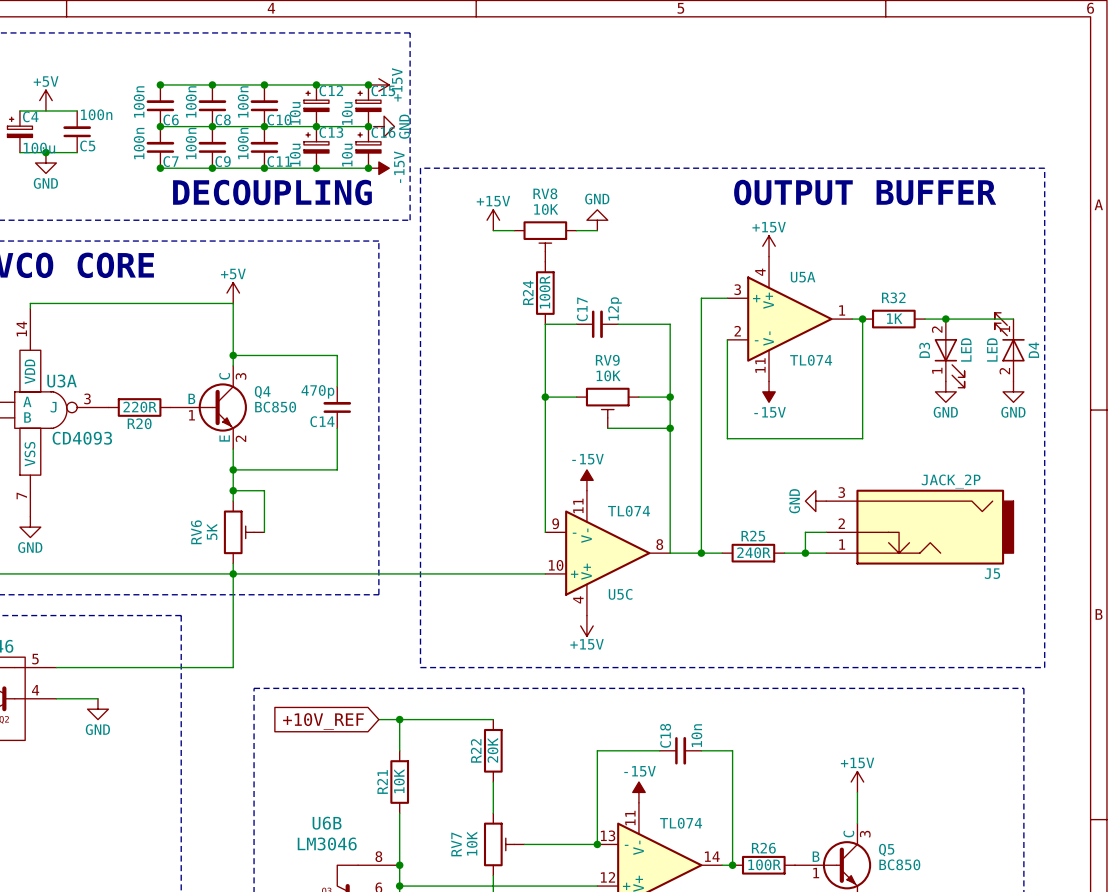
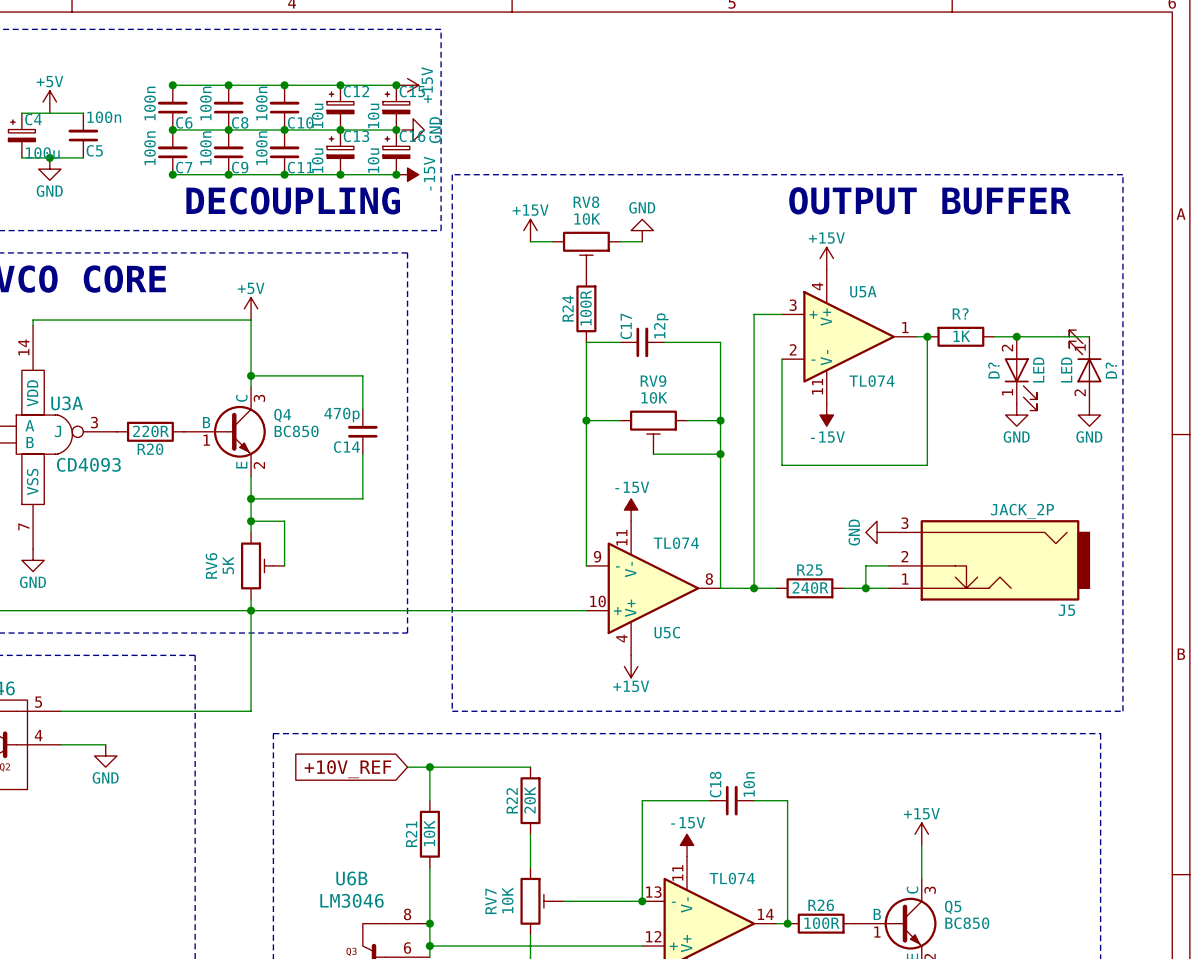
R32 name: R32 (893, 297) -> R? (960, 313)
D3 name: D3 (924, 350) -> D? (993, 370)
D4 name: D4 (1033, 350) -> D? (1111, 370)

